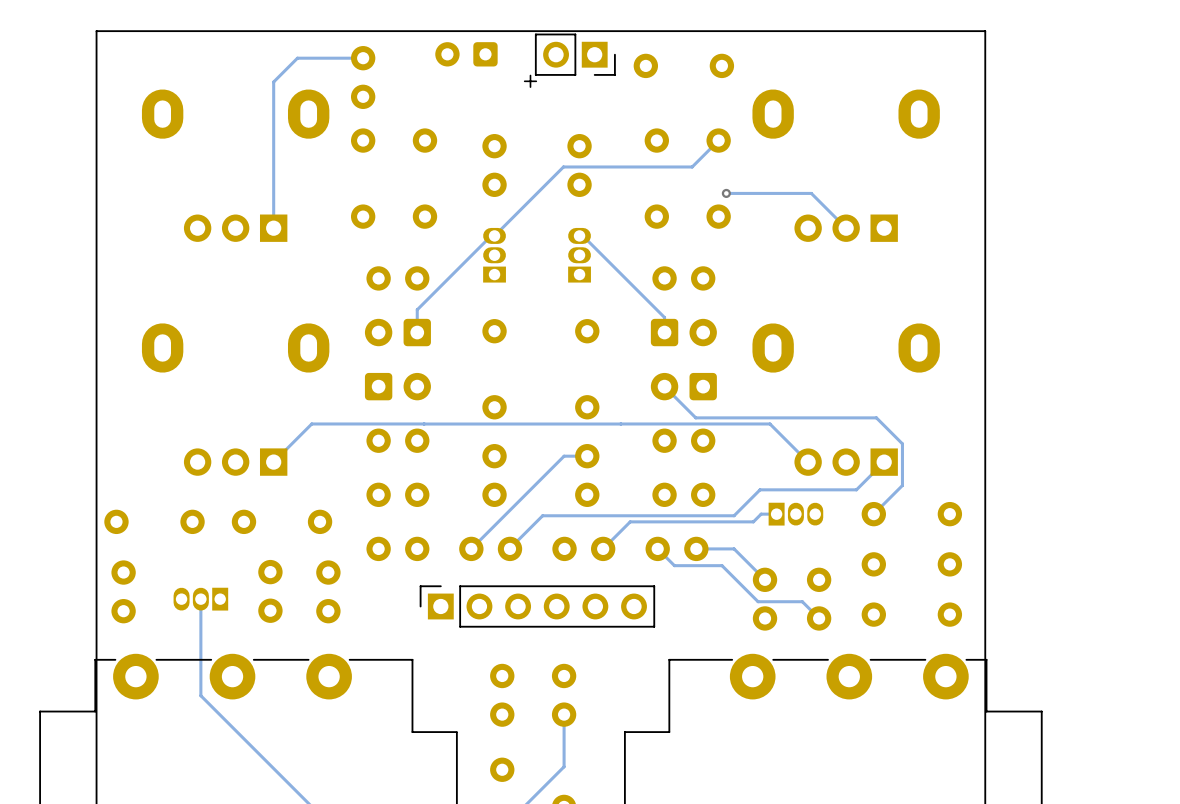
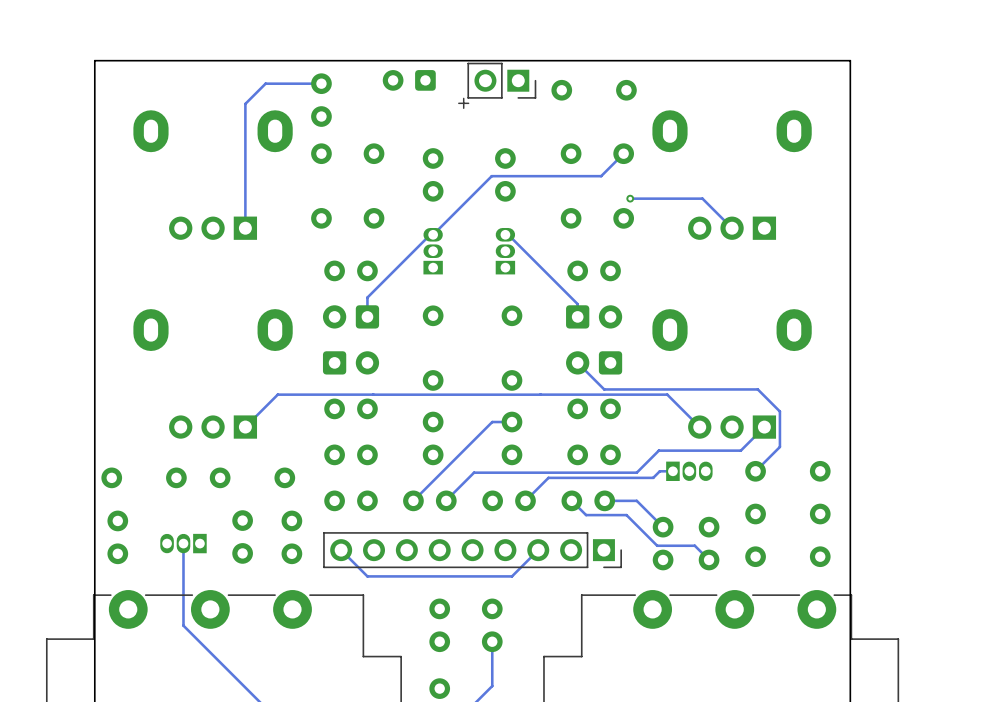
part footprint: [419, 585, 656, 628] -> [323, 532, 622, 569]
track: none -> (538, 550) (511, 576) (367, 576) (341, 550)

